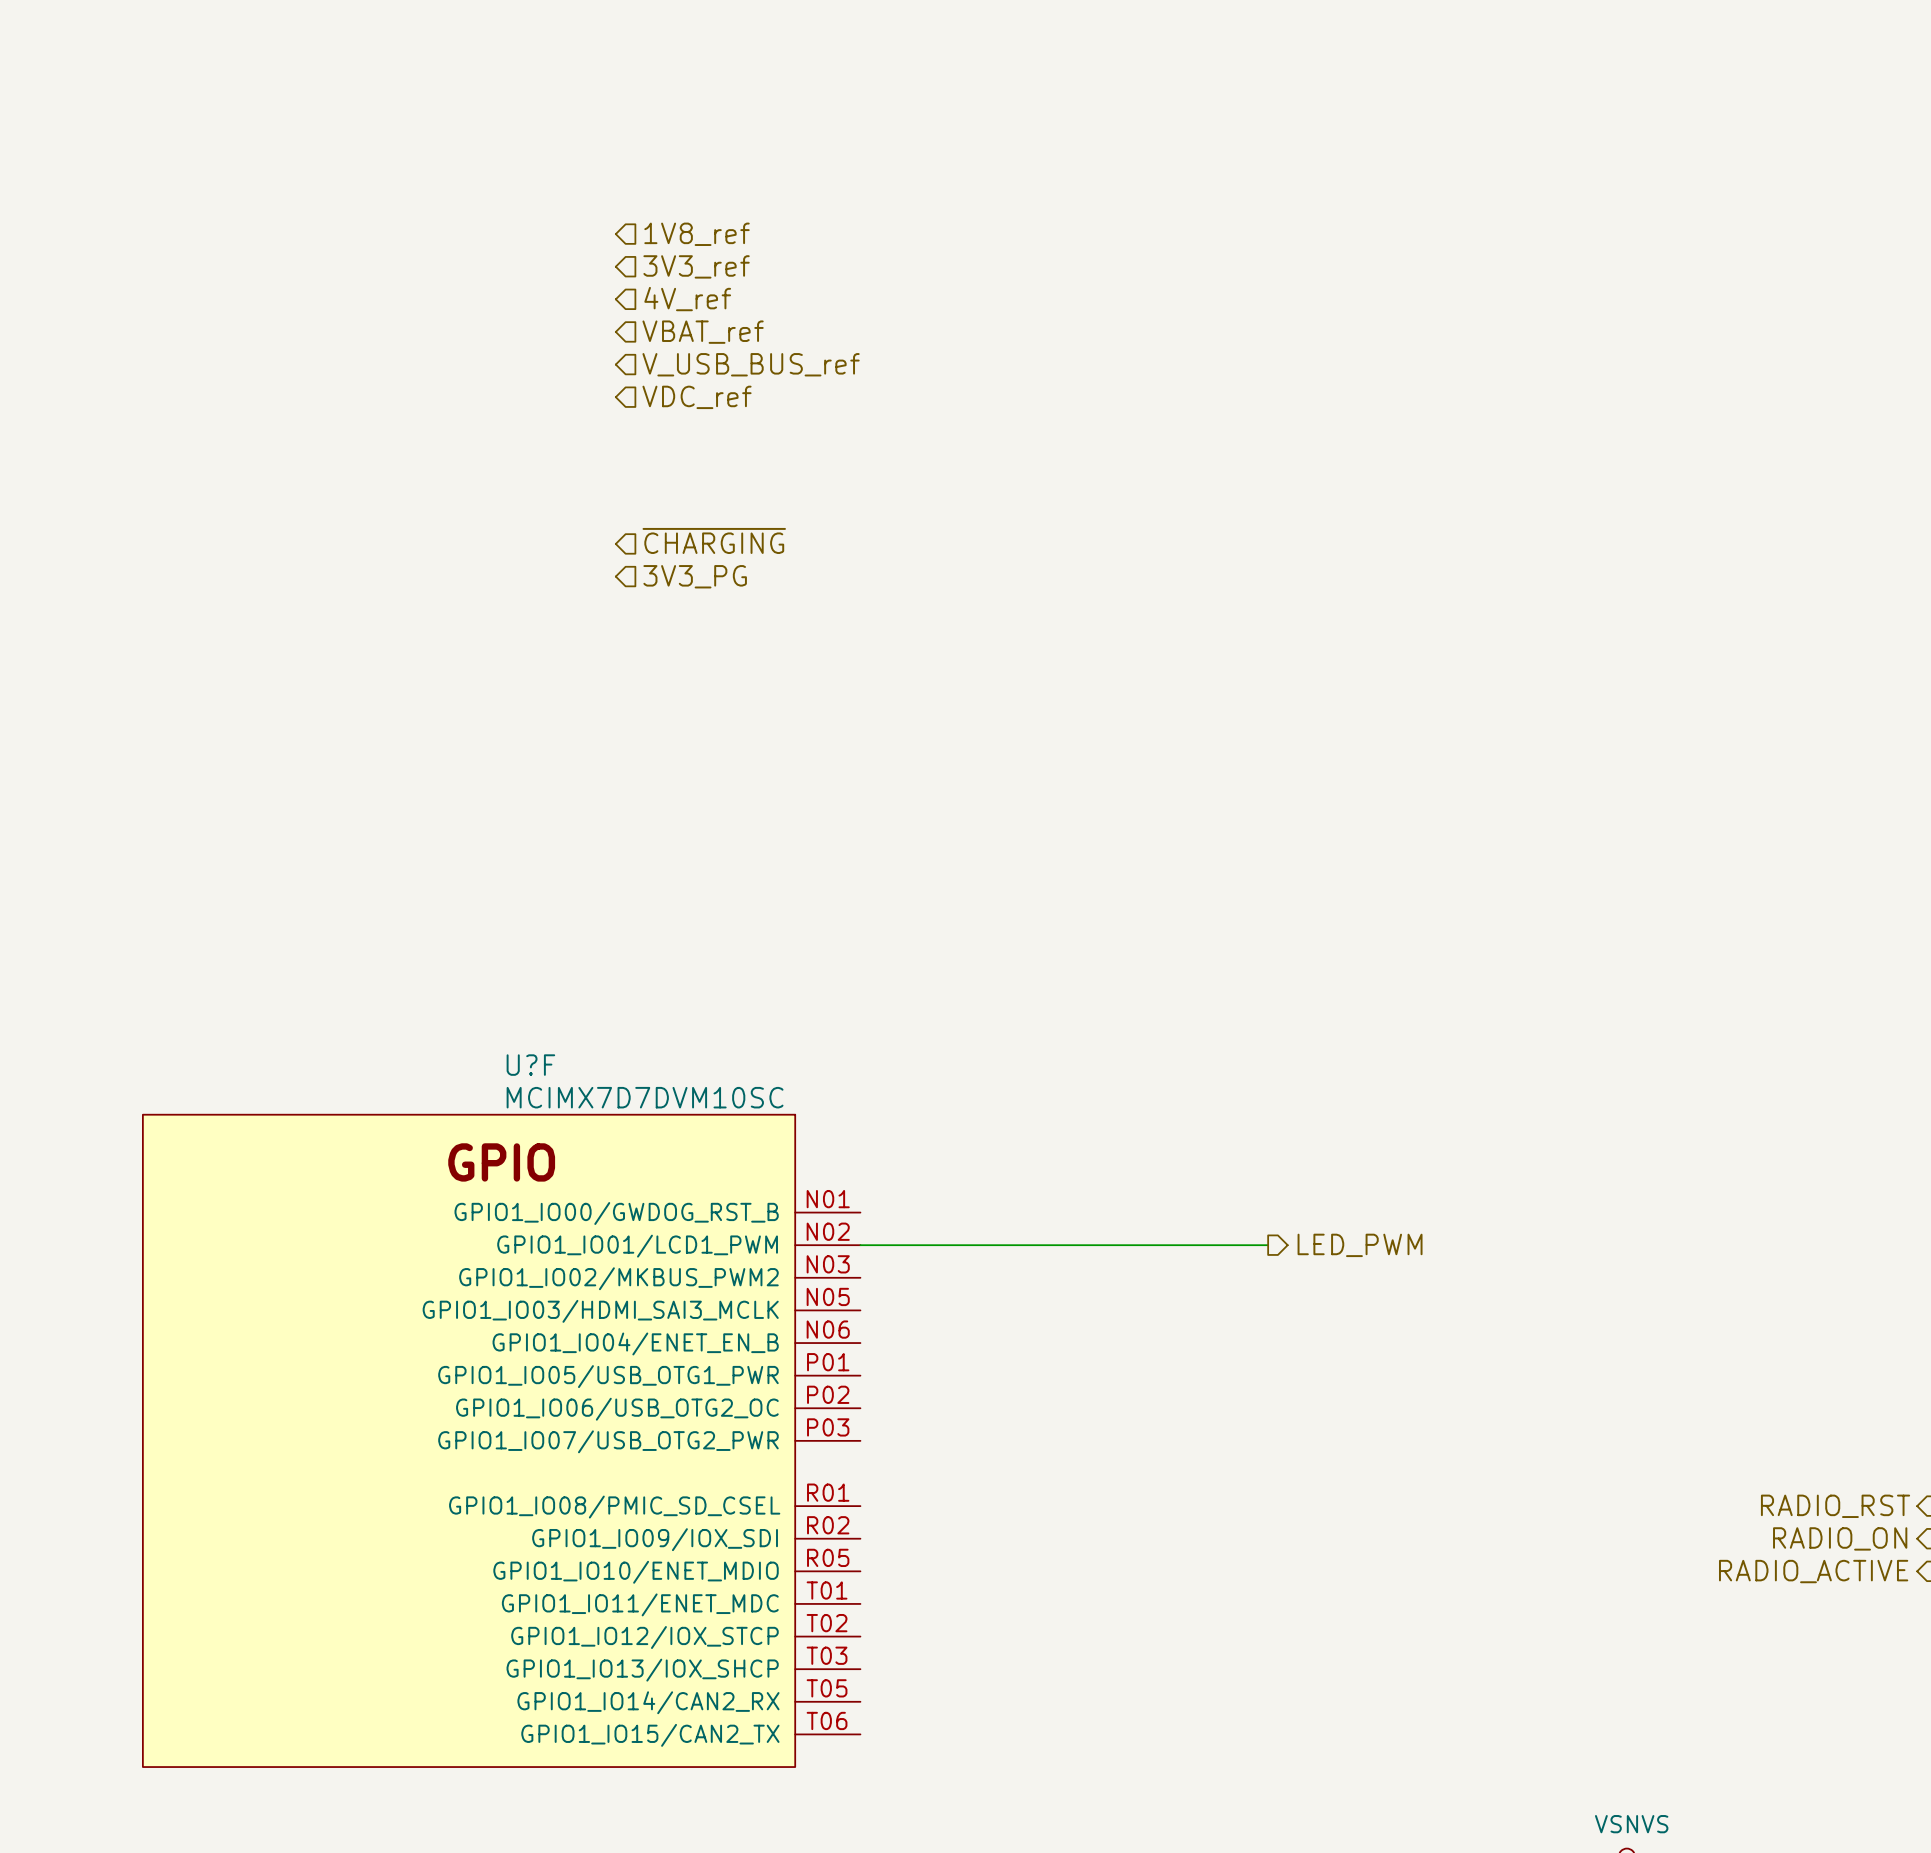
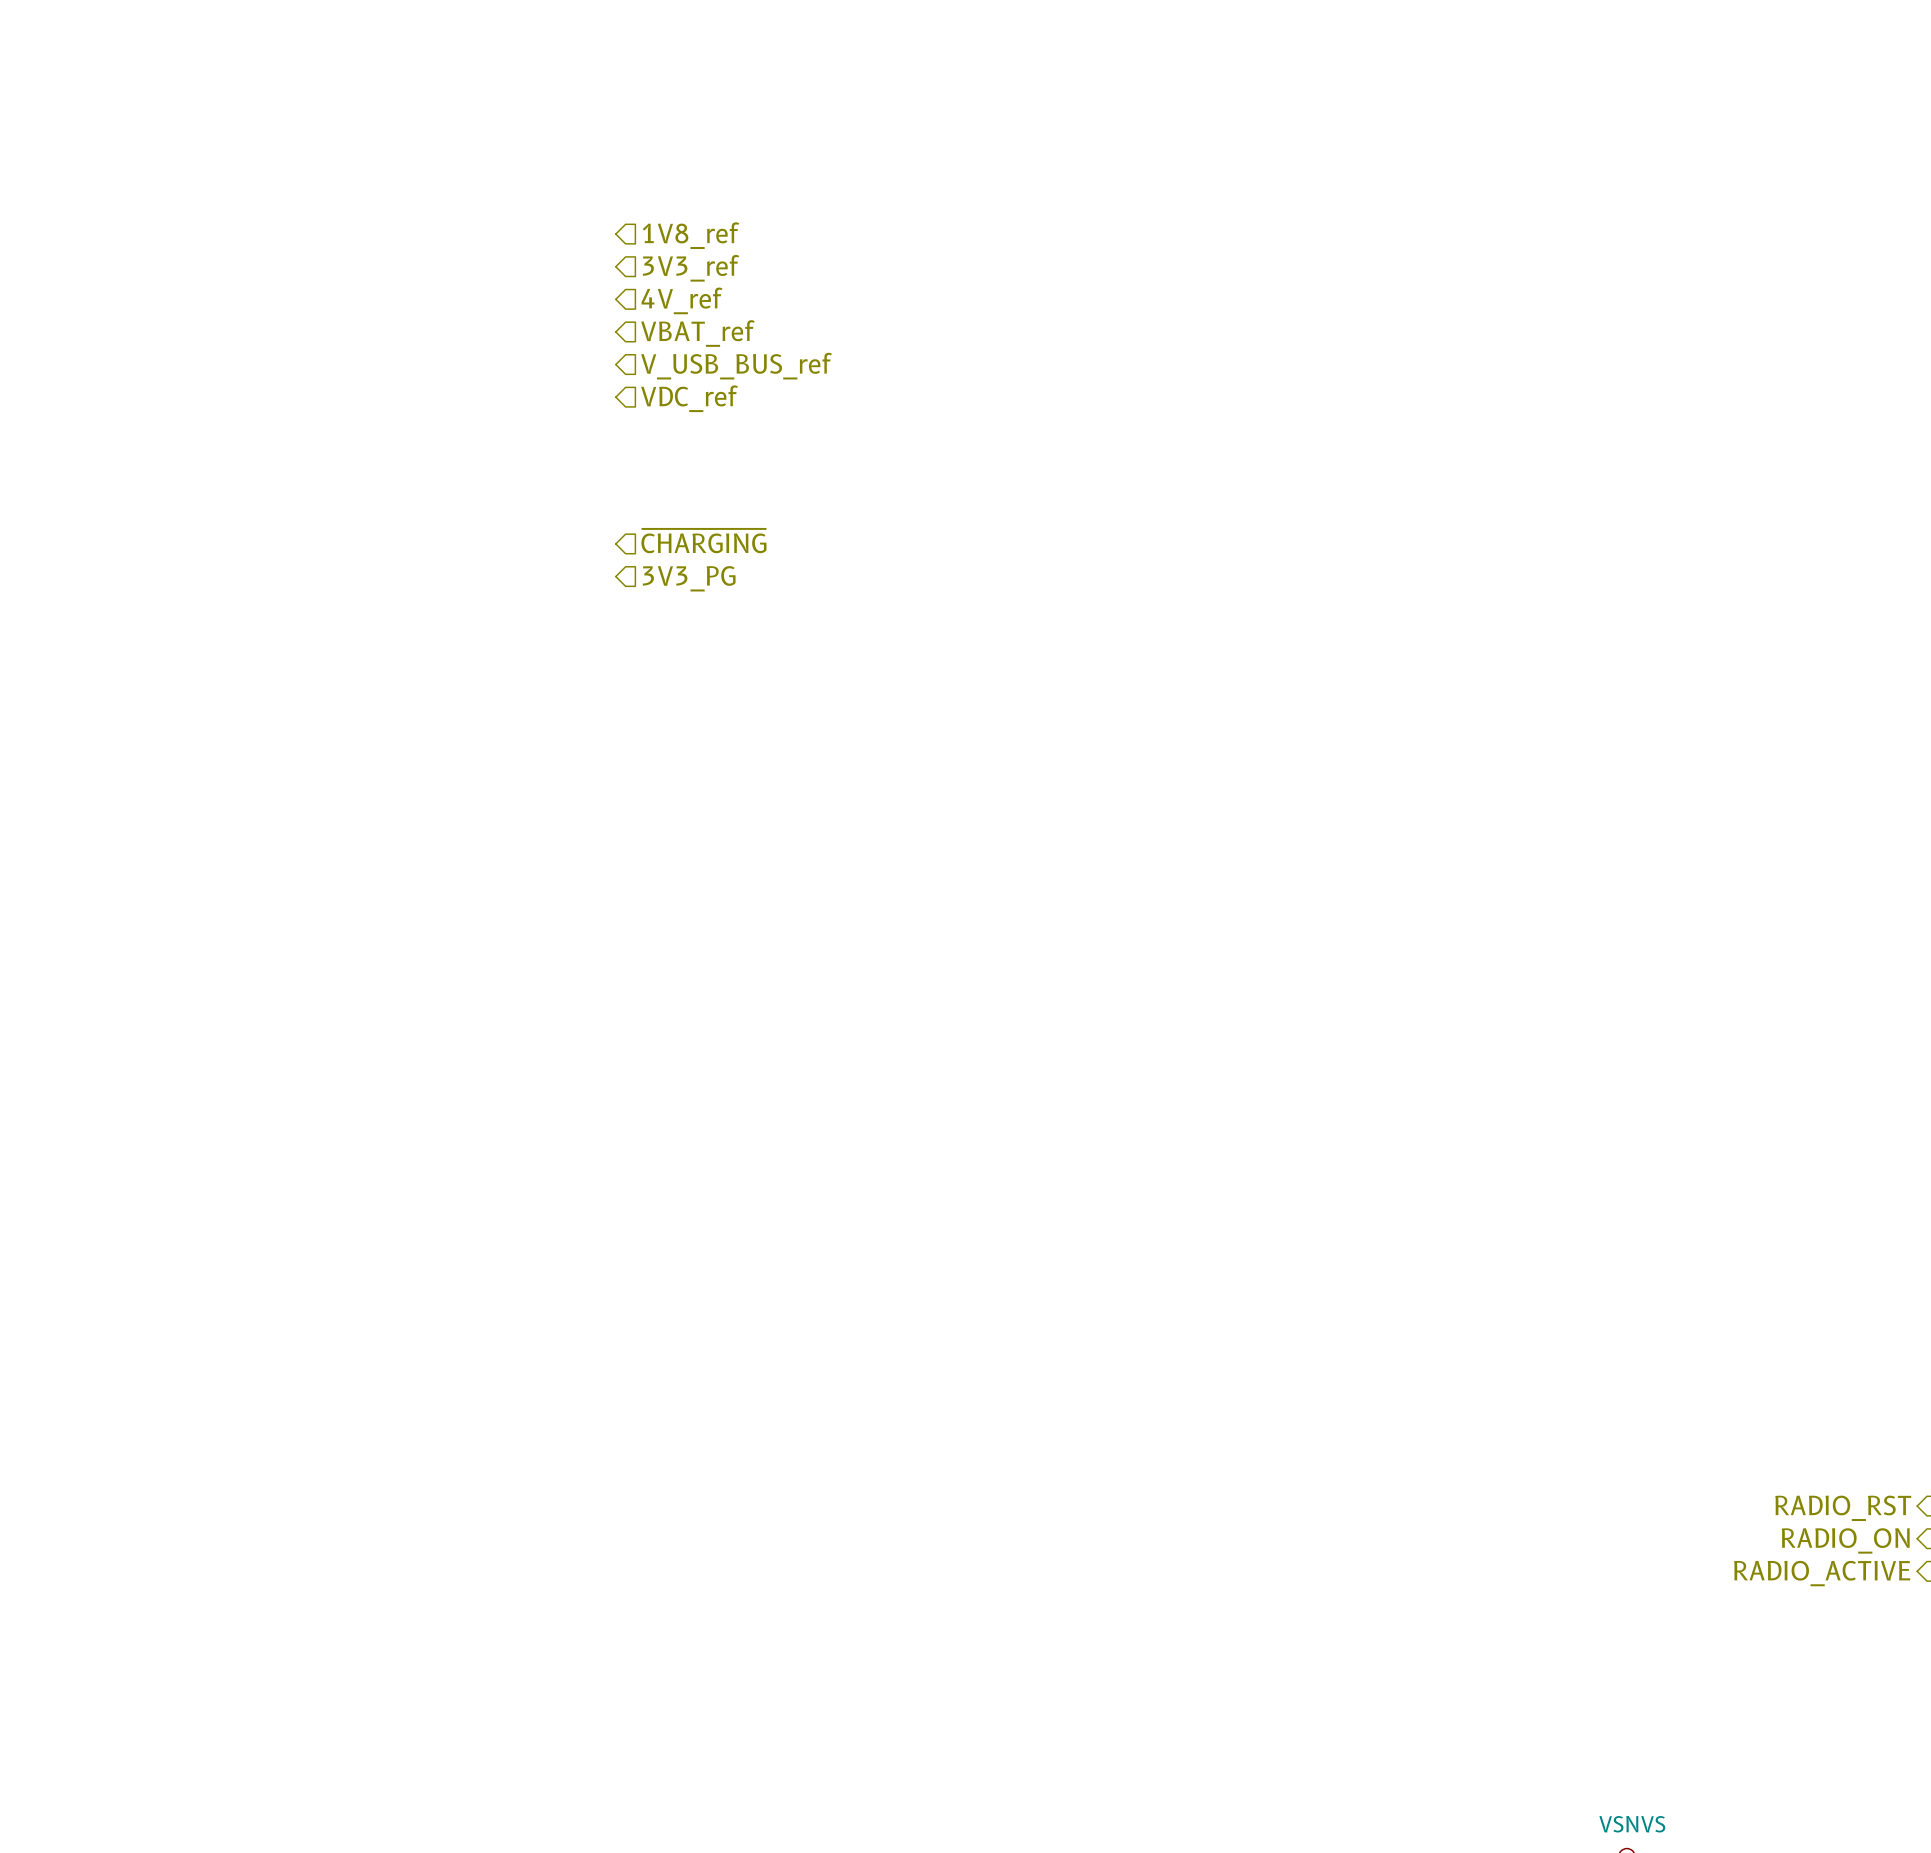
wire: (860, 1245) (1268, 1245) -> none
hierarchical label: LED_PWM (1360, 1245) -> none
U?F: MCIMX7D7DVM10SC (501, 1440) -> none

